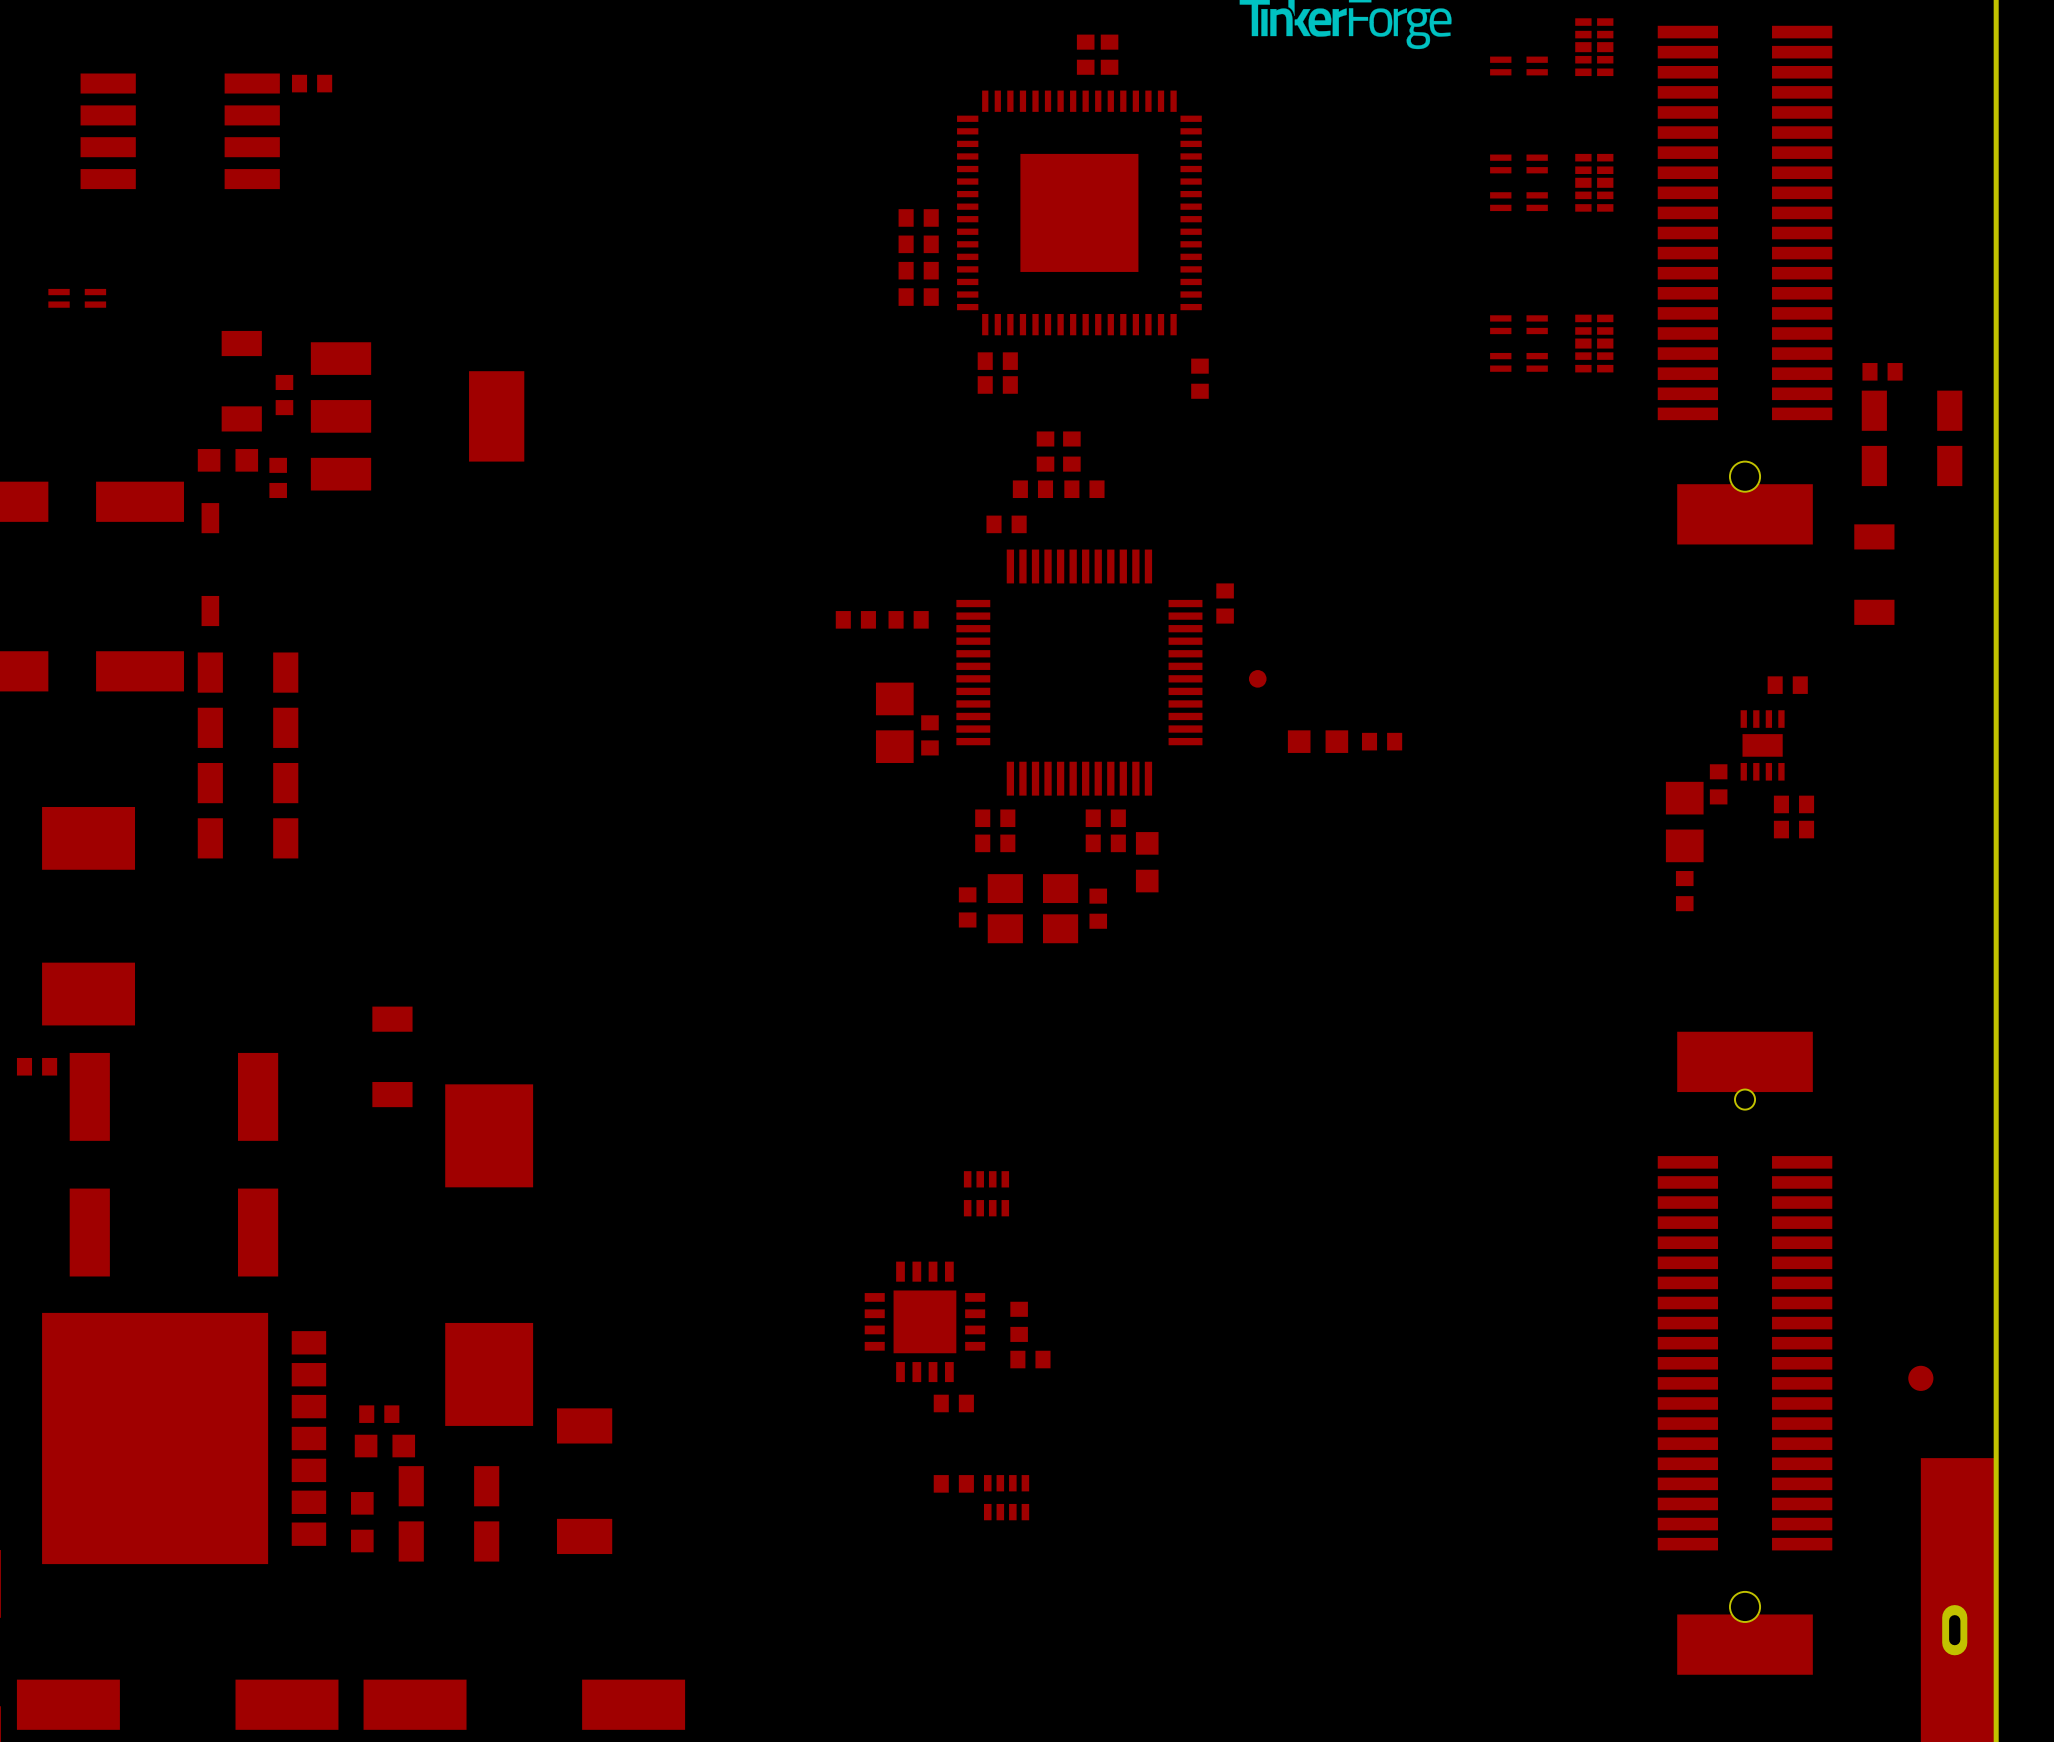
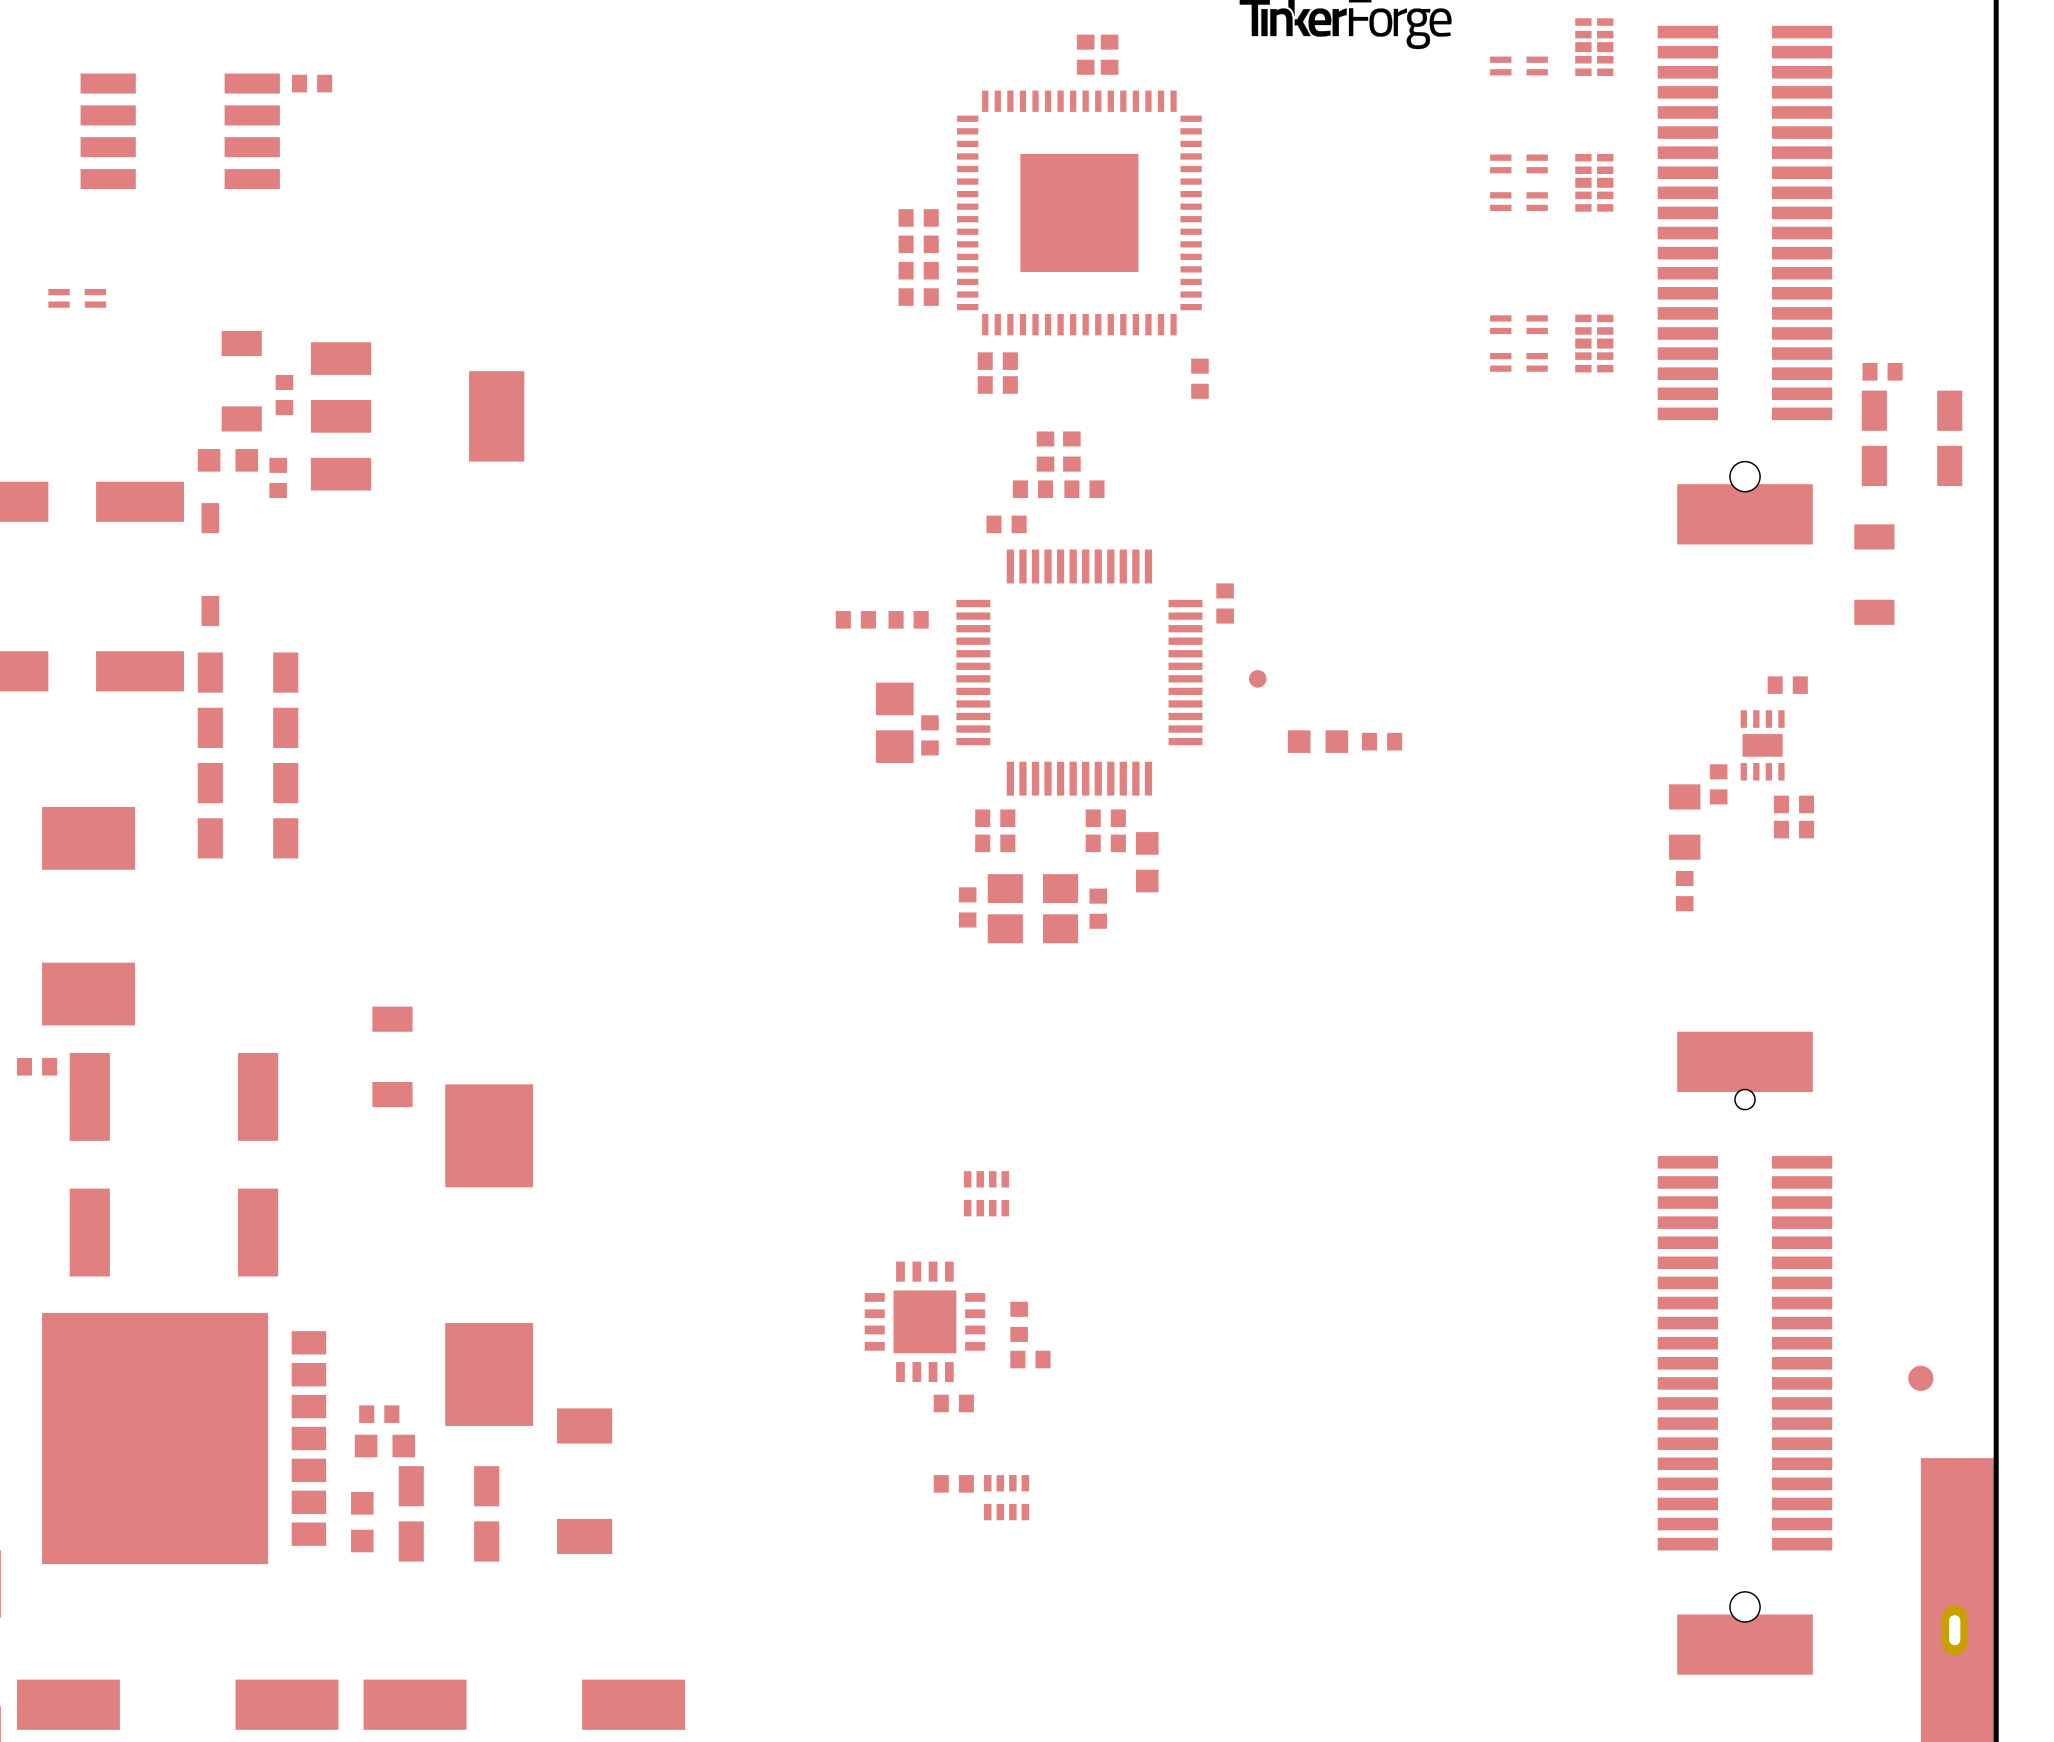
part footprint: [1665, 781, 1704, 863] -> [1669, 784, 1701, 860]

